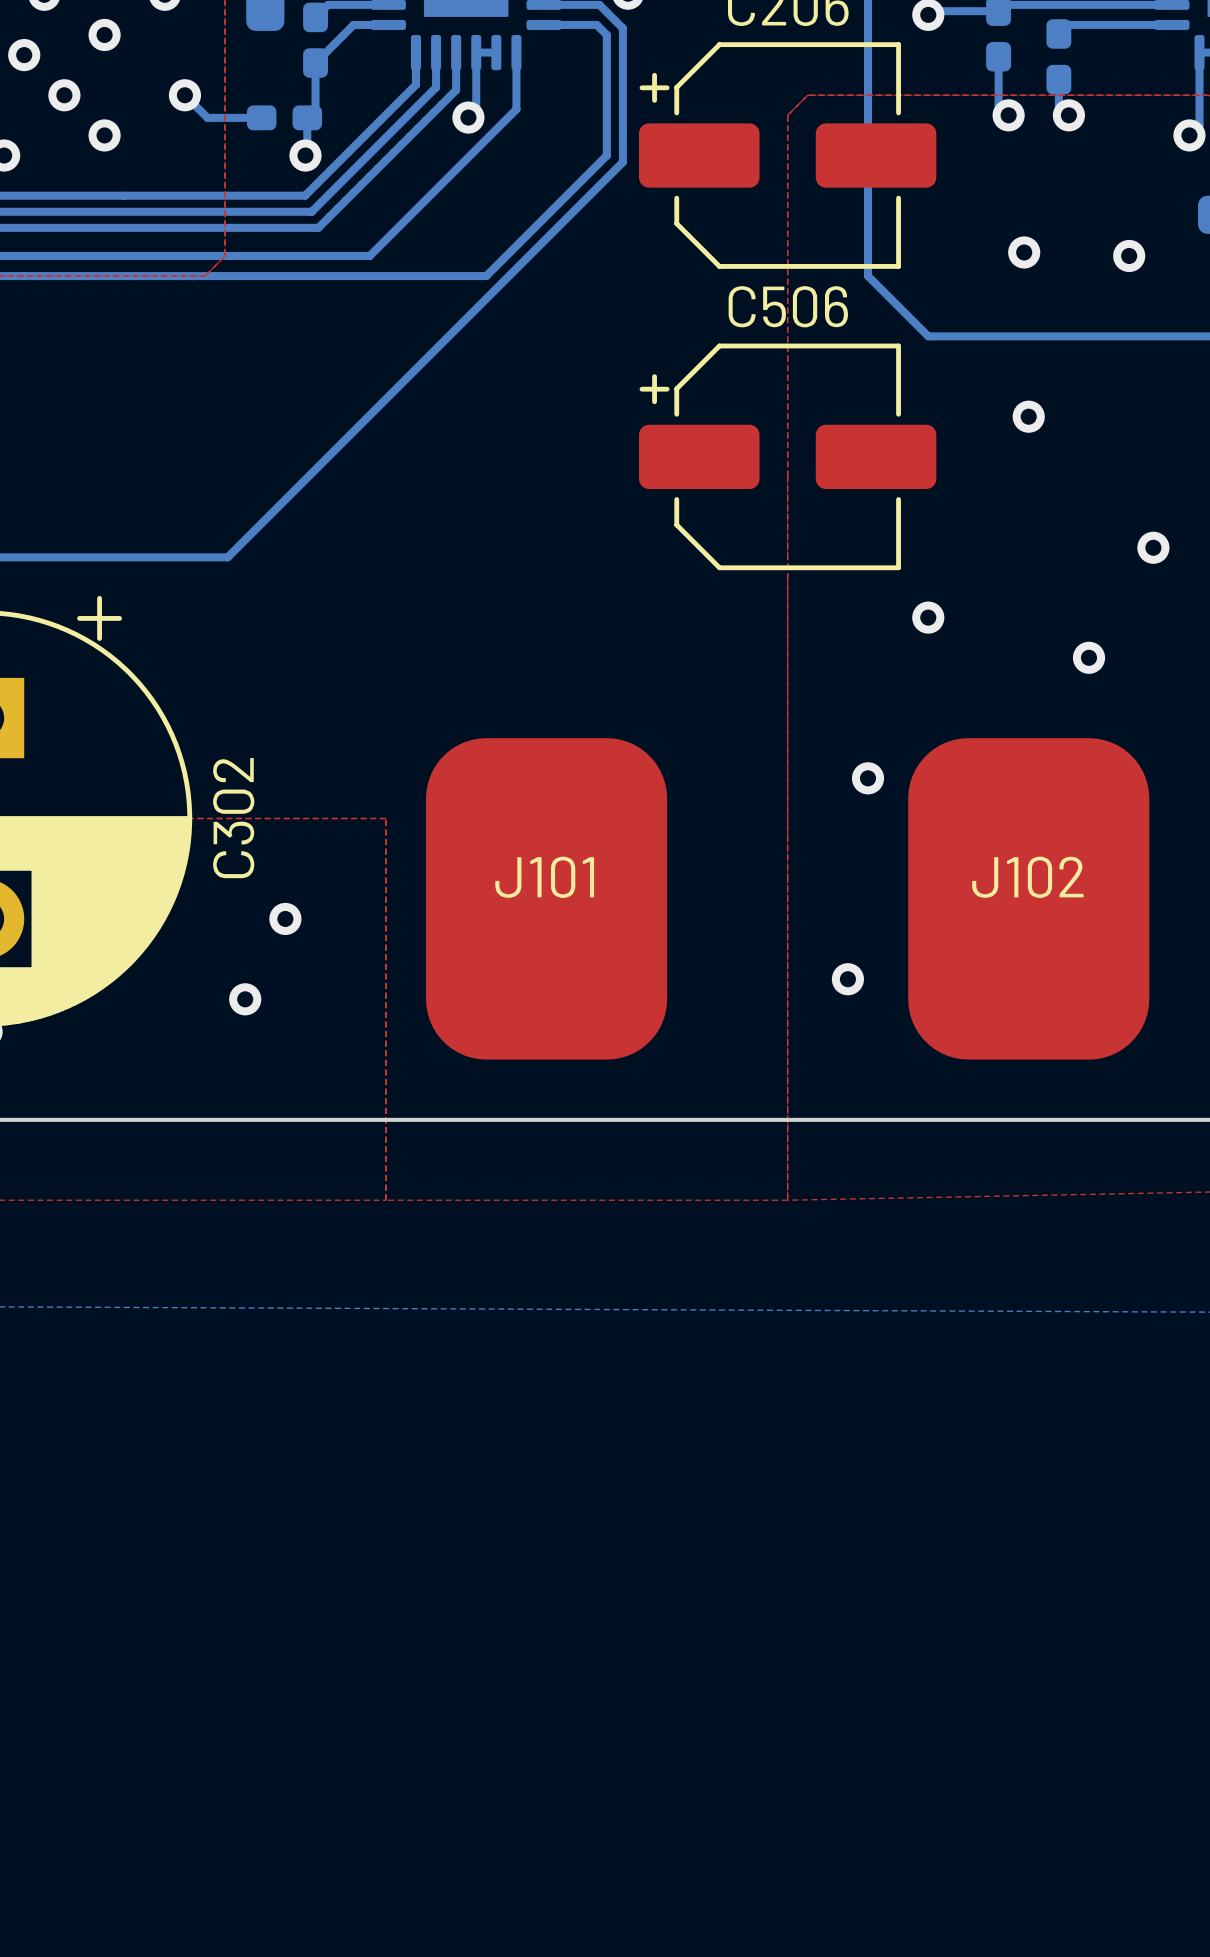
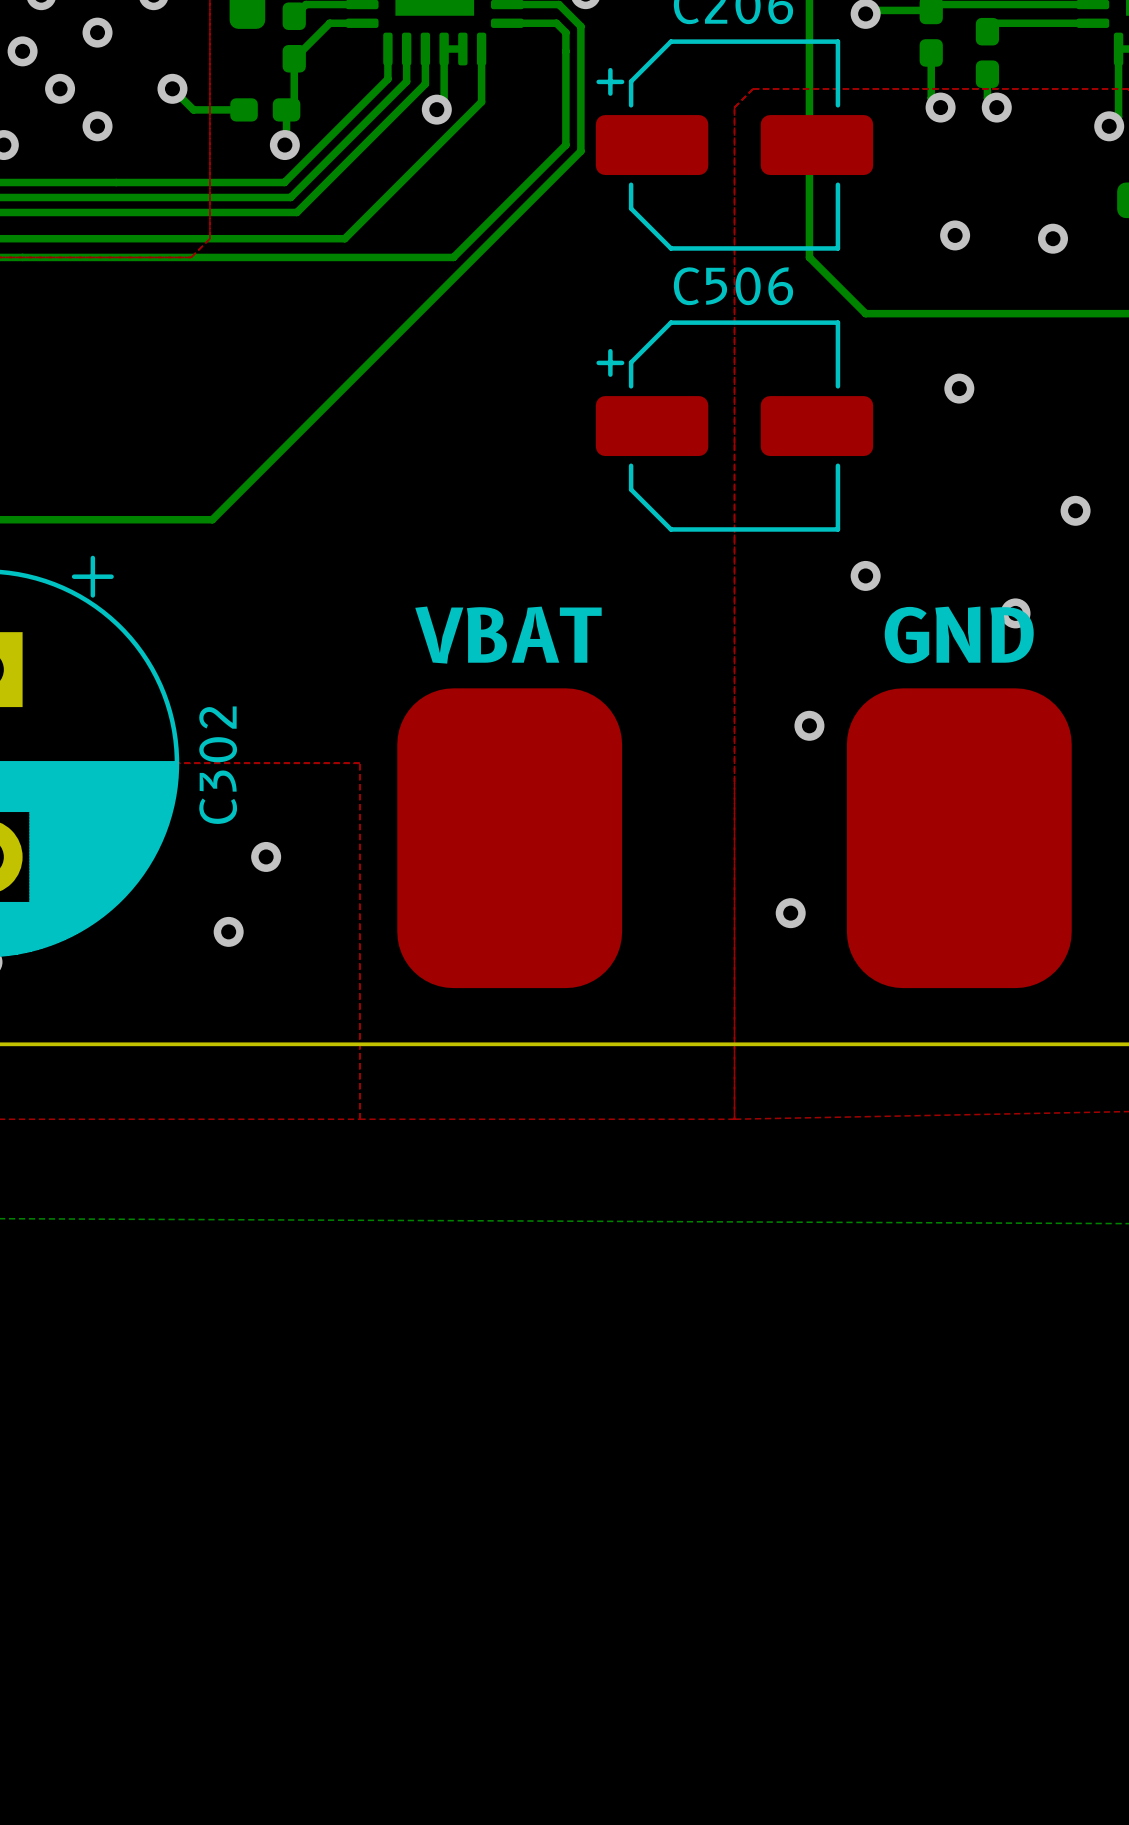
text: none -> VBAT (508, 635)
text: none -> GND (959, 634)
J101 name: J101 (544, 877) -> none
J102 name: J102 (1027, 877) -> none

